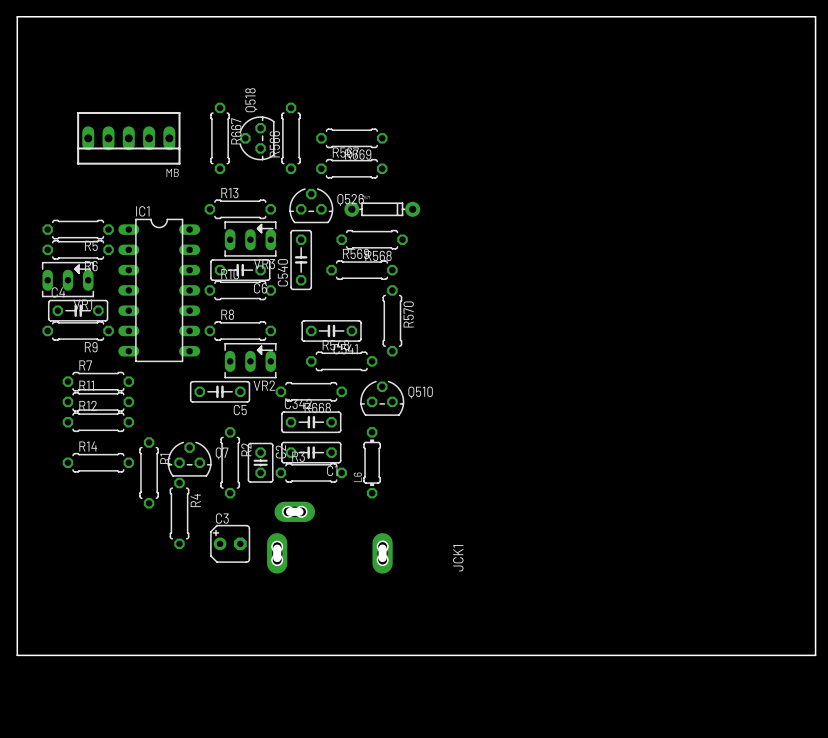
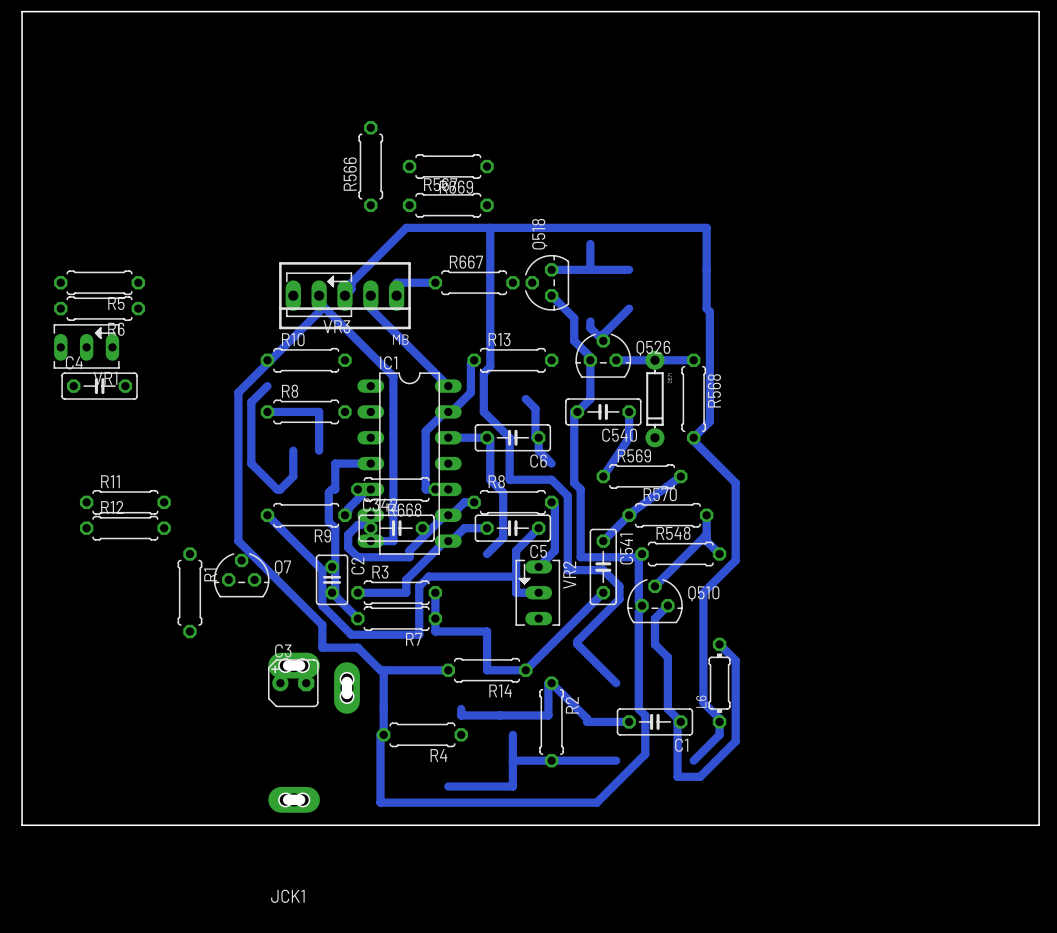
R667 name position: R667 (236, 131) -> R667 (466, 262)
MB position: (128, 138) -> (344, 295)
R667 rotation: 0° (220, 138) -> 90° clockwise (474, 282)
R667 position: (220, 138) -> (474, 282)
Q518 position: (257, 138) -> (547, 282)
bottom track: none -> (490, 227) (490, 366) (483, 373) (483, 411) (509, 437) (509, 479) (551, 479) (567, 495) (567, 570) (603, 570) (619, 586) (619, 599) (577, 641) (577, 644) (616, 683)
bottom track: none -> (590, 244) (590, 269)
Q526 position: (311, 205) -> (603, 355)
R13 position: (240, 209) -> (512, 360)
part rotation: 0° (382, 209) -> 90° clockwise (654, 399)
part position: (382, 209) -> (654, 399)
bottom track: none -> (551, 269) (629, 269)
bottom track: none -> (435, 282) (396, 282) (396, 295)
bottom track: none -> (344, 295) (351, 289) (351, 282) (406, 227) (706, 227) (706, 308) (709, 311) (709, 421) (693, 437) (693, 440) (735, 482) (735, 560) (703, 592) (703, 702) (719, 718) (719, 734) (693, 760)
bottom track: none -> (370, 295) (370, 308) (448, 386)
R568 rotation: 0° (372, 239) -> 90° clockwise (693, 399)
R568 position: (372, 239) -> (693, 399)
bottom track: none -> (551, 295) (574, 318) (574, 340) (590, 357) (590, 399) (577, 411) (574, 411) (574, 482) (580, 489) (580, 557) (638, 557)
bottom track: none -> (629, 308) (603, 334) (603, 340) (590, 327) (590, 321)
R568 name position: R568 (378, 255) -> R568 (714, 390)
C540 rotation: 0° (301, 259) -> 90° counterclockwise (603, 411)
C540 position: (301, 259) -> (603, 411)
C6 position: (240, 270) -> (512, 437)
R569 position: (361, 270) -> (642, 476)
IC1 position: (159, 290) -> (409, 463)
bottom track: none -> (474, 360) (470, 363) (470, 392) (451, 411) (445, 411) (425, 431) (425, 489) (448, 489)
bottom track: none -> (616, 360) (693, 360)
bottom track: none -> (267, 386) (251, 402) (251, 463) (277, 489) (280, 489) (293, 476) (293, 450)
R570 name position: R570 (408, 314) -> R570 (660, 494)
R570 rotation: 0° (392, 320) -> 90° clockwise (667, 515)
R570 position: (392, 320) -> (667, 515)
bottom track: none -> (525, 399) (535, 408) (535, 437) (538, 437) (538, 450) (551, 463)
R9 position: (78, 330) -> (306, 515)
bottom track: none -> (267, 411) (319, 411) (319, 450)
C541 rotation: 0° (331, 330) -> 90° counterclockwise (603, 566)
C541 position: (331, 330) -> (603, 566)
bottom track: none -> (629, 411) (629, 437) (603, 476)
bottom track: none -> (448, 437) (490, 437) (490, 479) (503, 492) (503, 537) (487, 554)
VR2 rotation: 0° (250, 360) -> 90° counterclockwise (537, 592)
VR2 position: (250, 360) -> (537, 592)
R548 position: (341, 361) -> (680, 554)
R7 name position: R7 (85, 365) -> R7 (414, 639)
bottom track: none -> (370, 463) (335, 463) (335, 489) (328, 492) (328, 521) (335, 528) (335, 595) (357, 618)
R7 position: (98, 381) -> (396, 618)
bottom track: none -> (680, 476) (632, 512) (632, 515) (629, 515) (603, 541)
C5 position: (220, 391) -> (512, 528)
bottom track: none -> (370, 489) (367, 489) (348, 508) (344, 515)
Q510 position: (382, 398) -> (654, 601)
bottom track: none -> (474, 502) (464, 502) (451, 515) (445, 515) (409, 550) (409, 557) (357, 557) (348, 547) (348, 534) (370, 515)
R8: none -> (512, 502)
bottom track: none -> (551, 502) (554, 505) (554, 550) (538, 566)
bottom track: none -> (267, 515) (322, 570) (322, 605) (351, 634) (419, 634) (419, 586) (428, 576) (516, 576)
bottom track: none -> (706, 515) (706, 534) (654, 586)
bottom track: none -> (487, 528) (464, 528) (451, 541) (445, 541) (406, 579) (406, 592) (357, 592)
bottom track: none -> (538, 528) (516, 550) (516, 592) (538, 592)
bottom track: none -> (705, 536) (706, 541) (719, 554)
bottom track: none -> (370, 541) (393, 541) (393, 376) (319, 302) (319, 295) (322, 308) (238, 392) (238, 541) (322, 625) (322, 647) (357, 647) (380, 670) (448, 670)
bottom track: none -> (638, 557) (638, 602) (642, 605) (638, 612) (638, 709) (645, 715) (645, 754) (596, 802) (380, 802) (380, 734) (383, 734) (383, 670)
R14 name position: R14 (88, 446) -> R14 (500, 690)
C1 position: (311, 452) -> (654, 721)
R14 position: (98, 462) -> (487, 670)
R2 position: (230, 462) -> (551, 721)
L6 position: (372, 462) -> (719, 683)
bottom track: none -> (435, 592) (435, 631) (487, 631) (487, 670) (525, 670) (603, 592)
bottom track: none -> (667, 605) (654, 618) (654, 644) (667, 657) (667, 709) (680, 721) (677, 721) (677, 776) (700, 776) (735, 741) (735, 660) (719, 644)
R4 rotation: 0° (179, 513) -> 90° clockwise (422, 734)
R4 position: (179, 513) -> (422, 734)
JCK1 rotation: 0° (329, 537) -> 90° clockwise (314, 732)
JCK1 position: (329, 537) -> (314, 732)
bottom track: none -> (461, 709) (461, 715) (548, 715) (548, 683) (551, 683) (587, 718) (587, 721) (629, 721)
bottom track: none -> (512, 734) (512, 786) (448, 786)
bottom track: none -> (512, 760) (616, 760)

